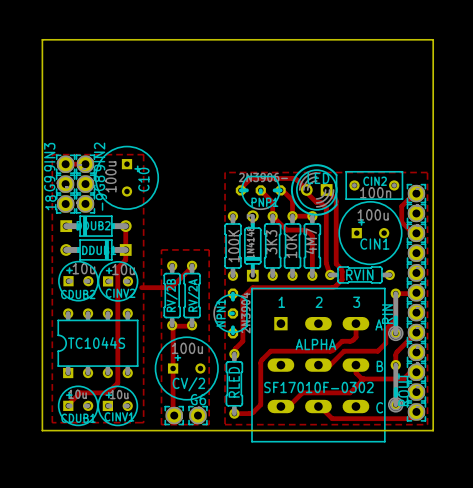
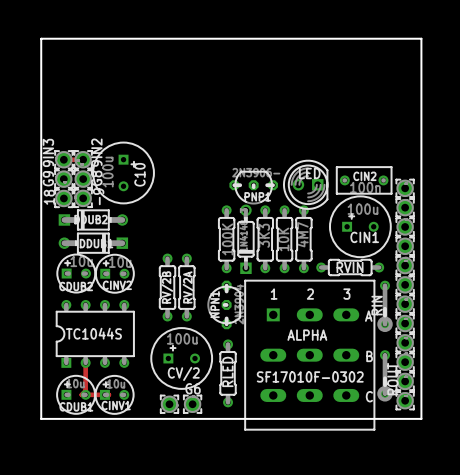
zone outline: (52, 154) (52, 422) (143, 422) (143, 154) (52, 154) -> none
zone outline: (225, 172) (427, 172) (427, 424) (225, 424) (225, 172) -> none
track: (326, 189) (336, 200) (336, 263) (341, 269) (342, 279) (332, 287) (252, 287) (243, 298) (242, 341) (235, 349) (234, 354) -> none
track: (240, 190) (250, 178) (296, 179) (316, 202) (320, 202) (326, 208) (326, 263) (330, 274) -> none
track: (260, 190) (272, 202) (272, 216) (286, 230) (305, 230) (312, 236) (312, 275) -> none
track: (280, 190) (292, 200) (292, 216) (312, 216) -> none
track: (416, 193) (401, 206) (401, 222) (409, 230) (413, 230) (416, 233) -> none
track: (125, 226) (125, 249) -> none
zone outline: (161, 249) (209, 249) (209, 424) (161, 424) (161, 249) -> none
track: (125, 250) (125, 259) (117, 267) (117, 382) (107, 392) (80, 392) (68, 405) -> none
track: (192, 265) (171, 287) (141, 287) -> none
track: (416, 292) (395, 293) (395, 319) (385, 329) (385, 343) (377, 351) (344, 351) (330, 365) (318, 365) -> none
track: (355, 323) (356, 337) (351, 341) (342, 341) (331, 351) (270, 351) (260, 362) (260, 404) (251, 413) (234, 413) -> none
track: (192, 325) (173, 326) -> none
track: (173, 326) (174, 415) -> none
track: (416, 332) (396, 352) (395, 365) -> none
track: (356, 365) (356, 373) (362, 378) (403, 378) (410, 372) (416, 372) -> none
track: none -> (85, 362) (85, 390) (81, 394) (108, 394)
track: (364, 378) (350, 392) (302, 392) (288, 406) (280, 406) -> none
track: (318, 406) (332, 418) (409, 418) (416, 411) -> none

